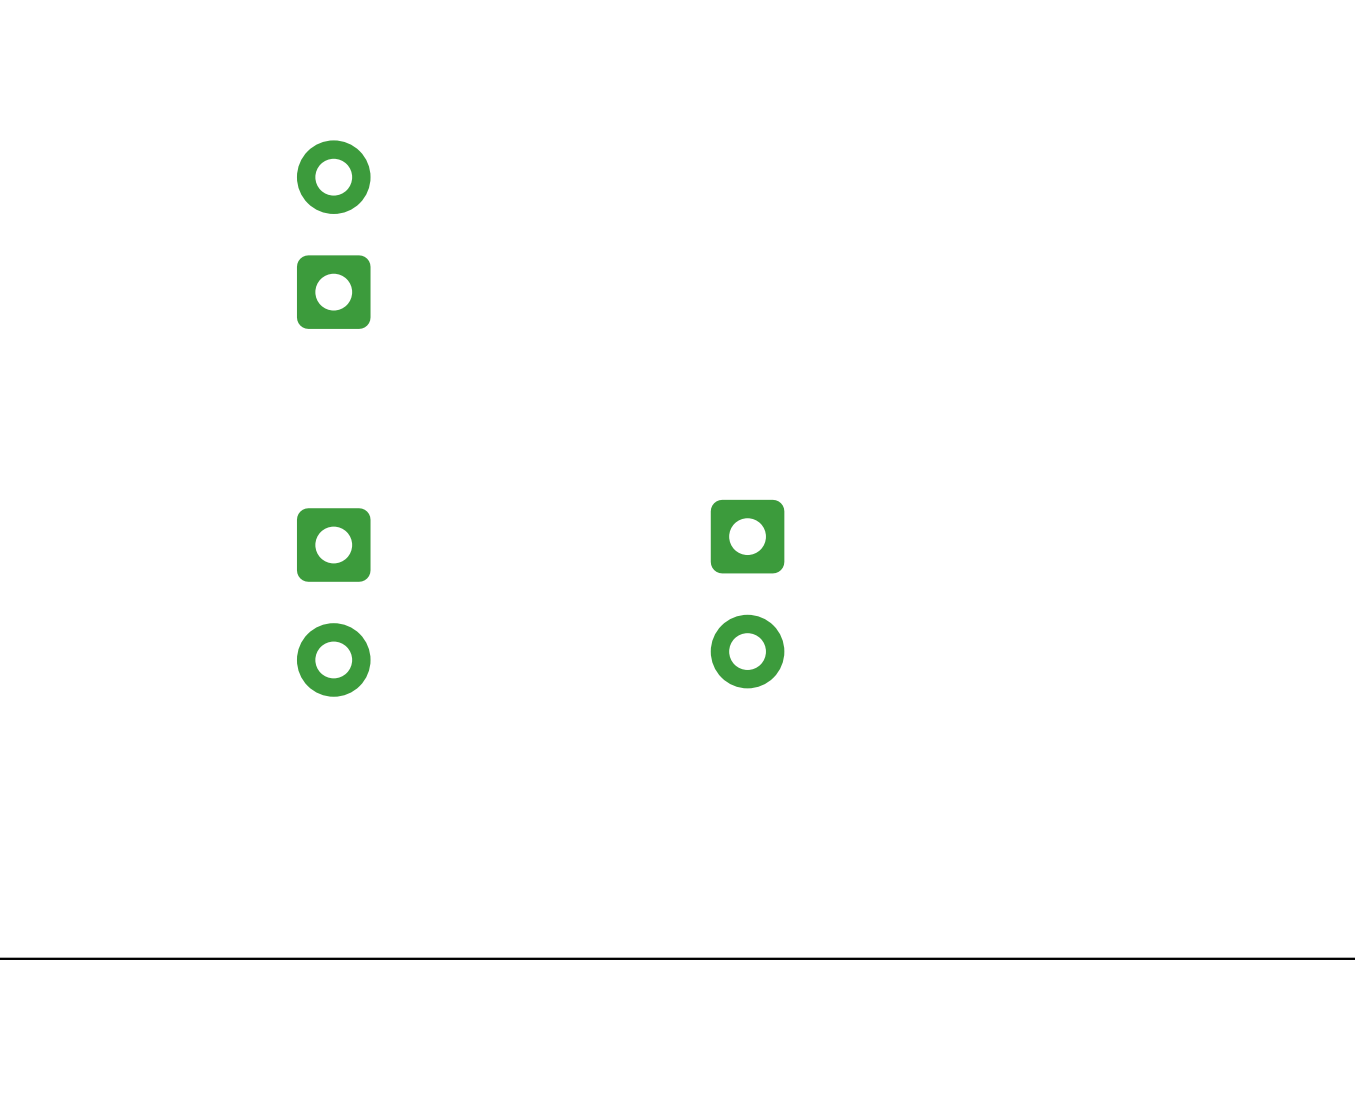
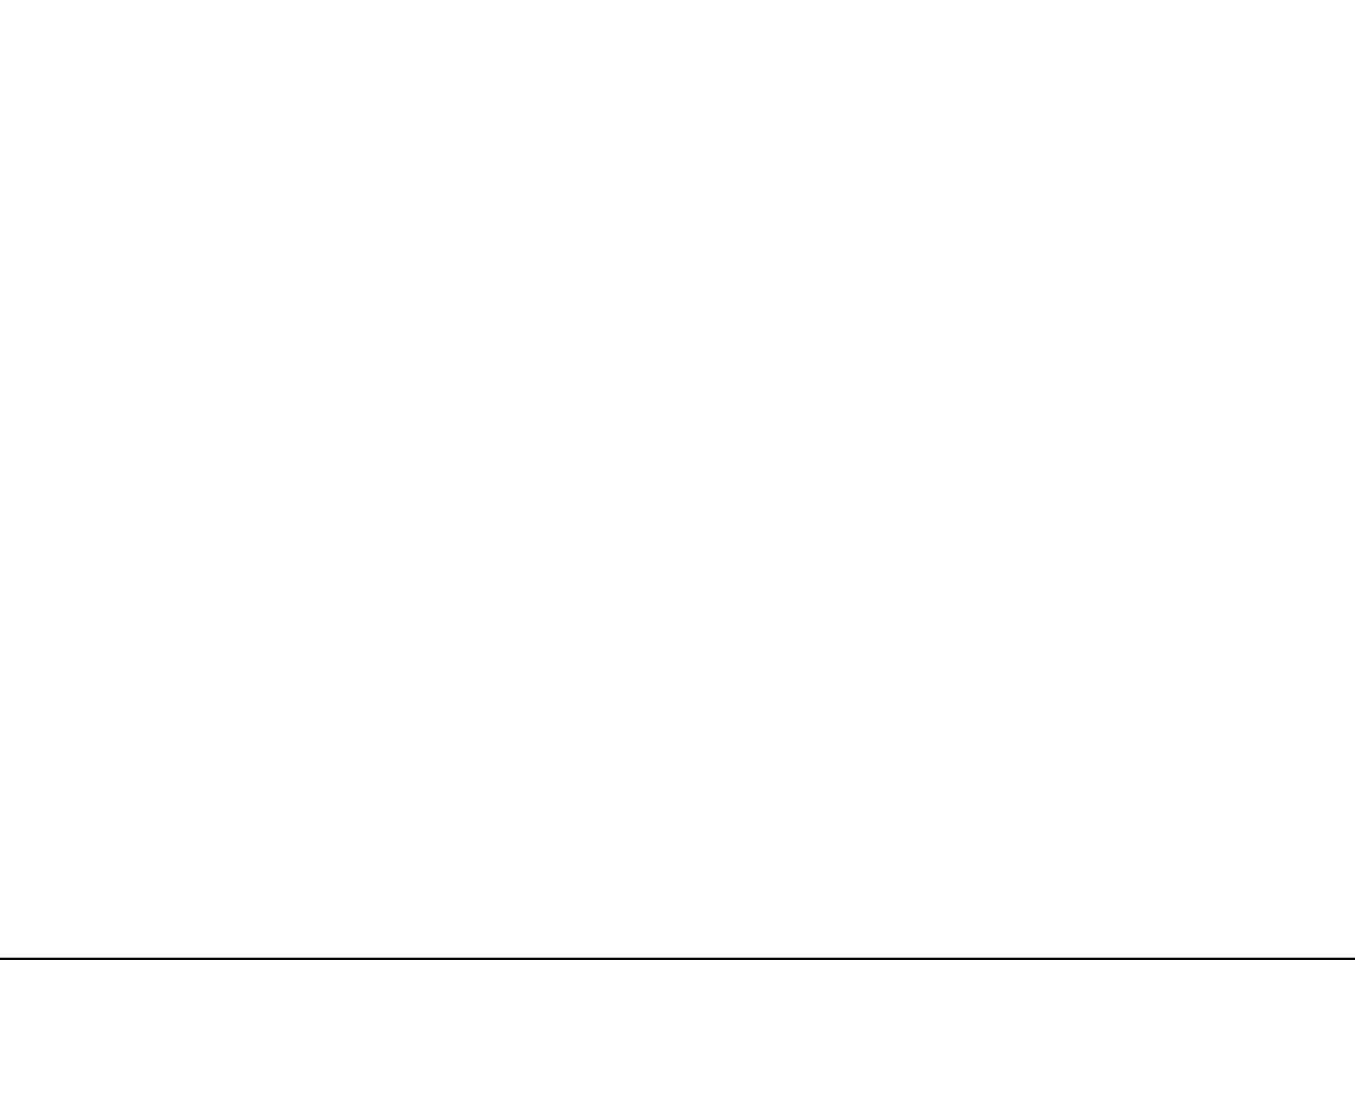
part: (333, 234) -> none
part: (747, 594) -> none
part: (333, 602) -> none

